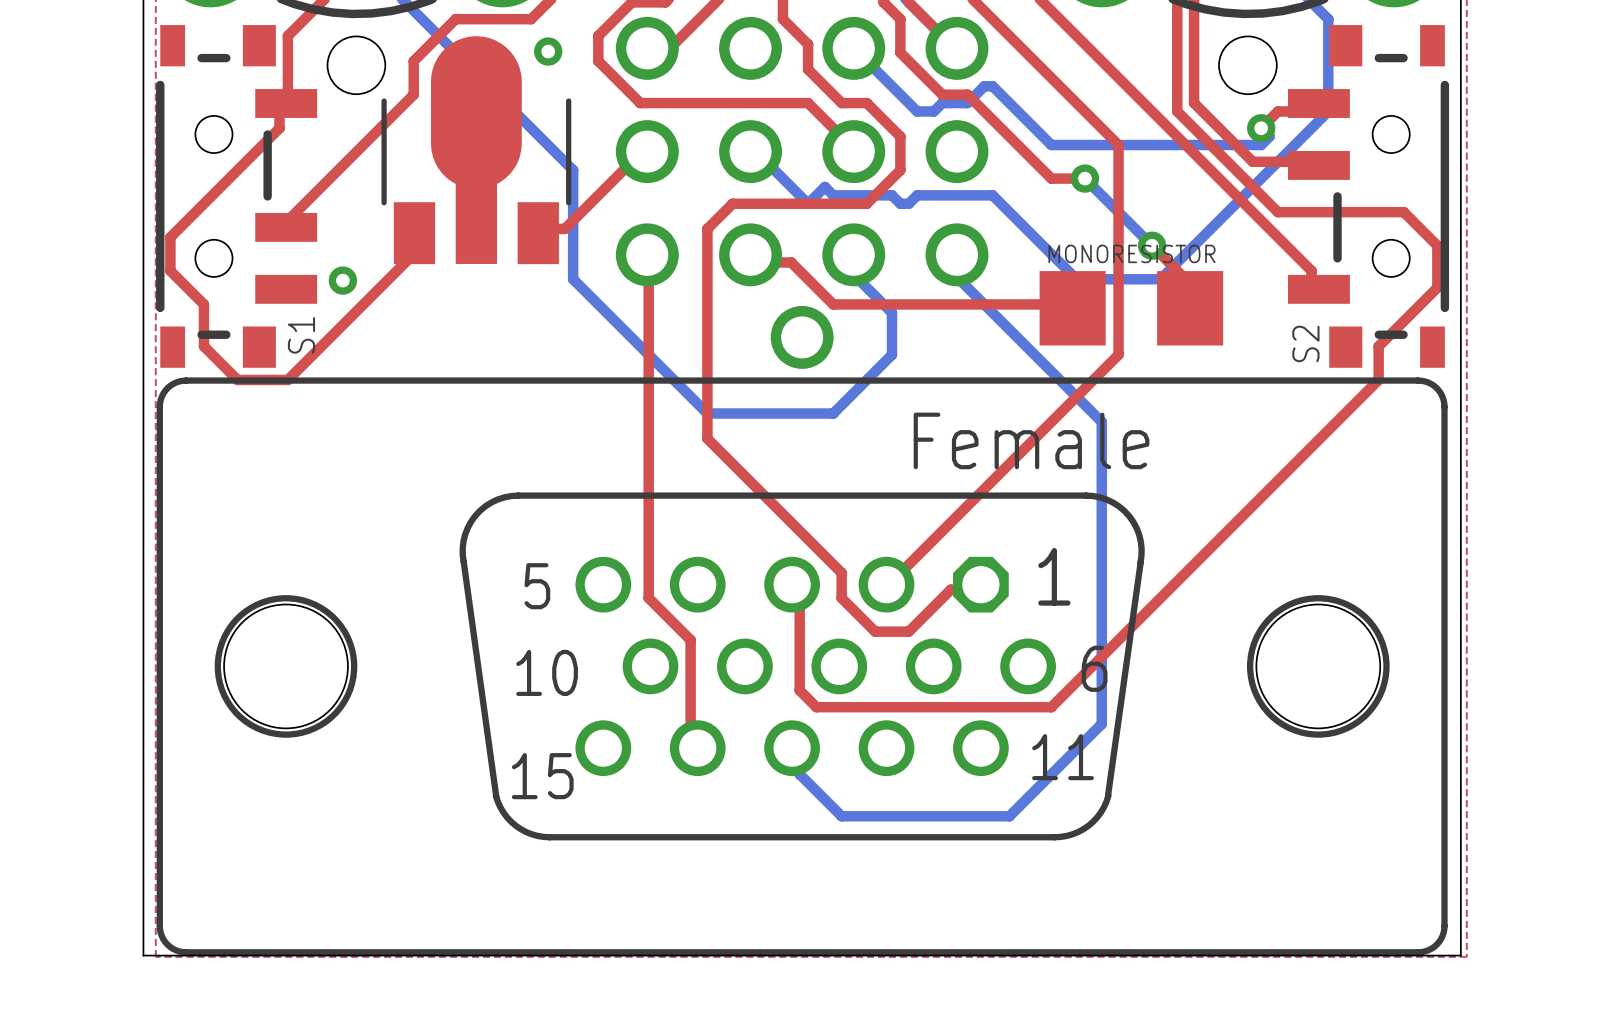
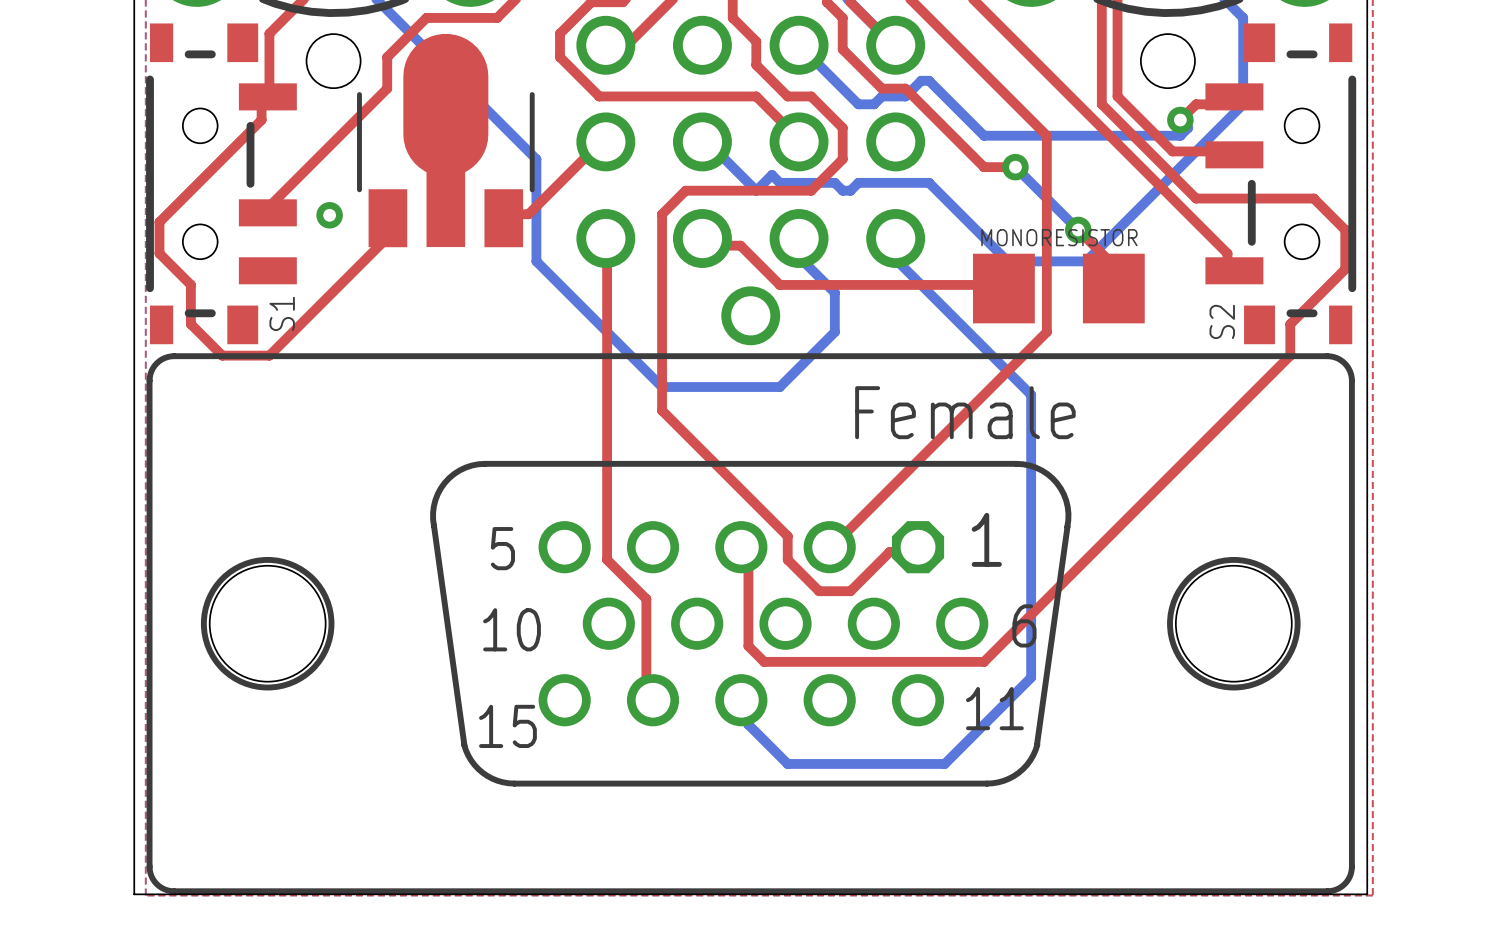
via: (548, 51) -> none
via position: (342, 280) -> (329, 215)

